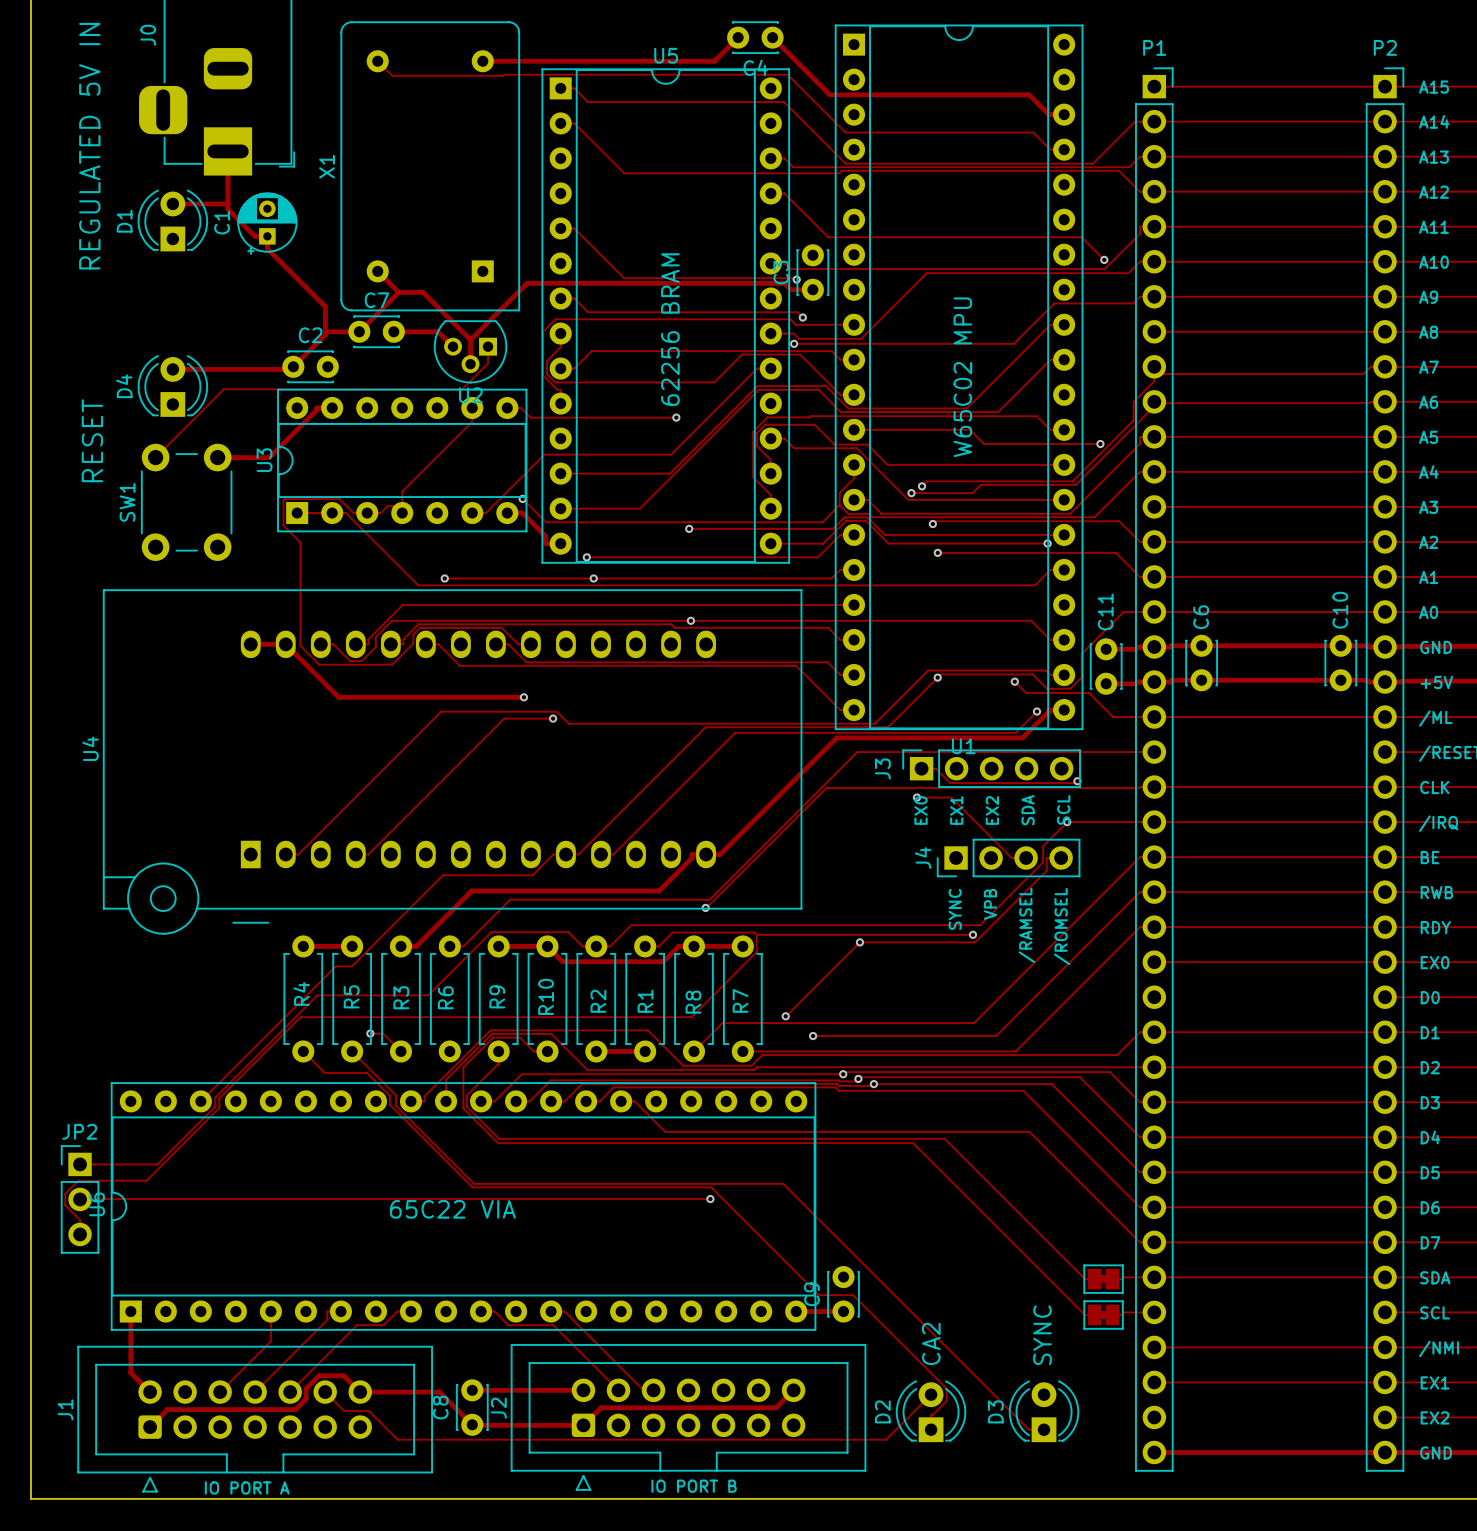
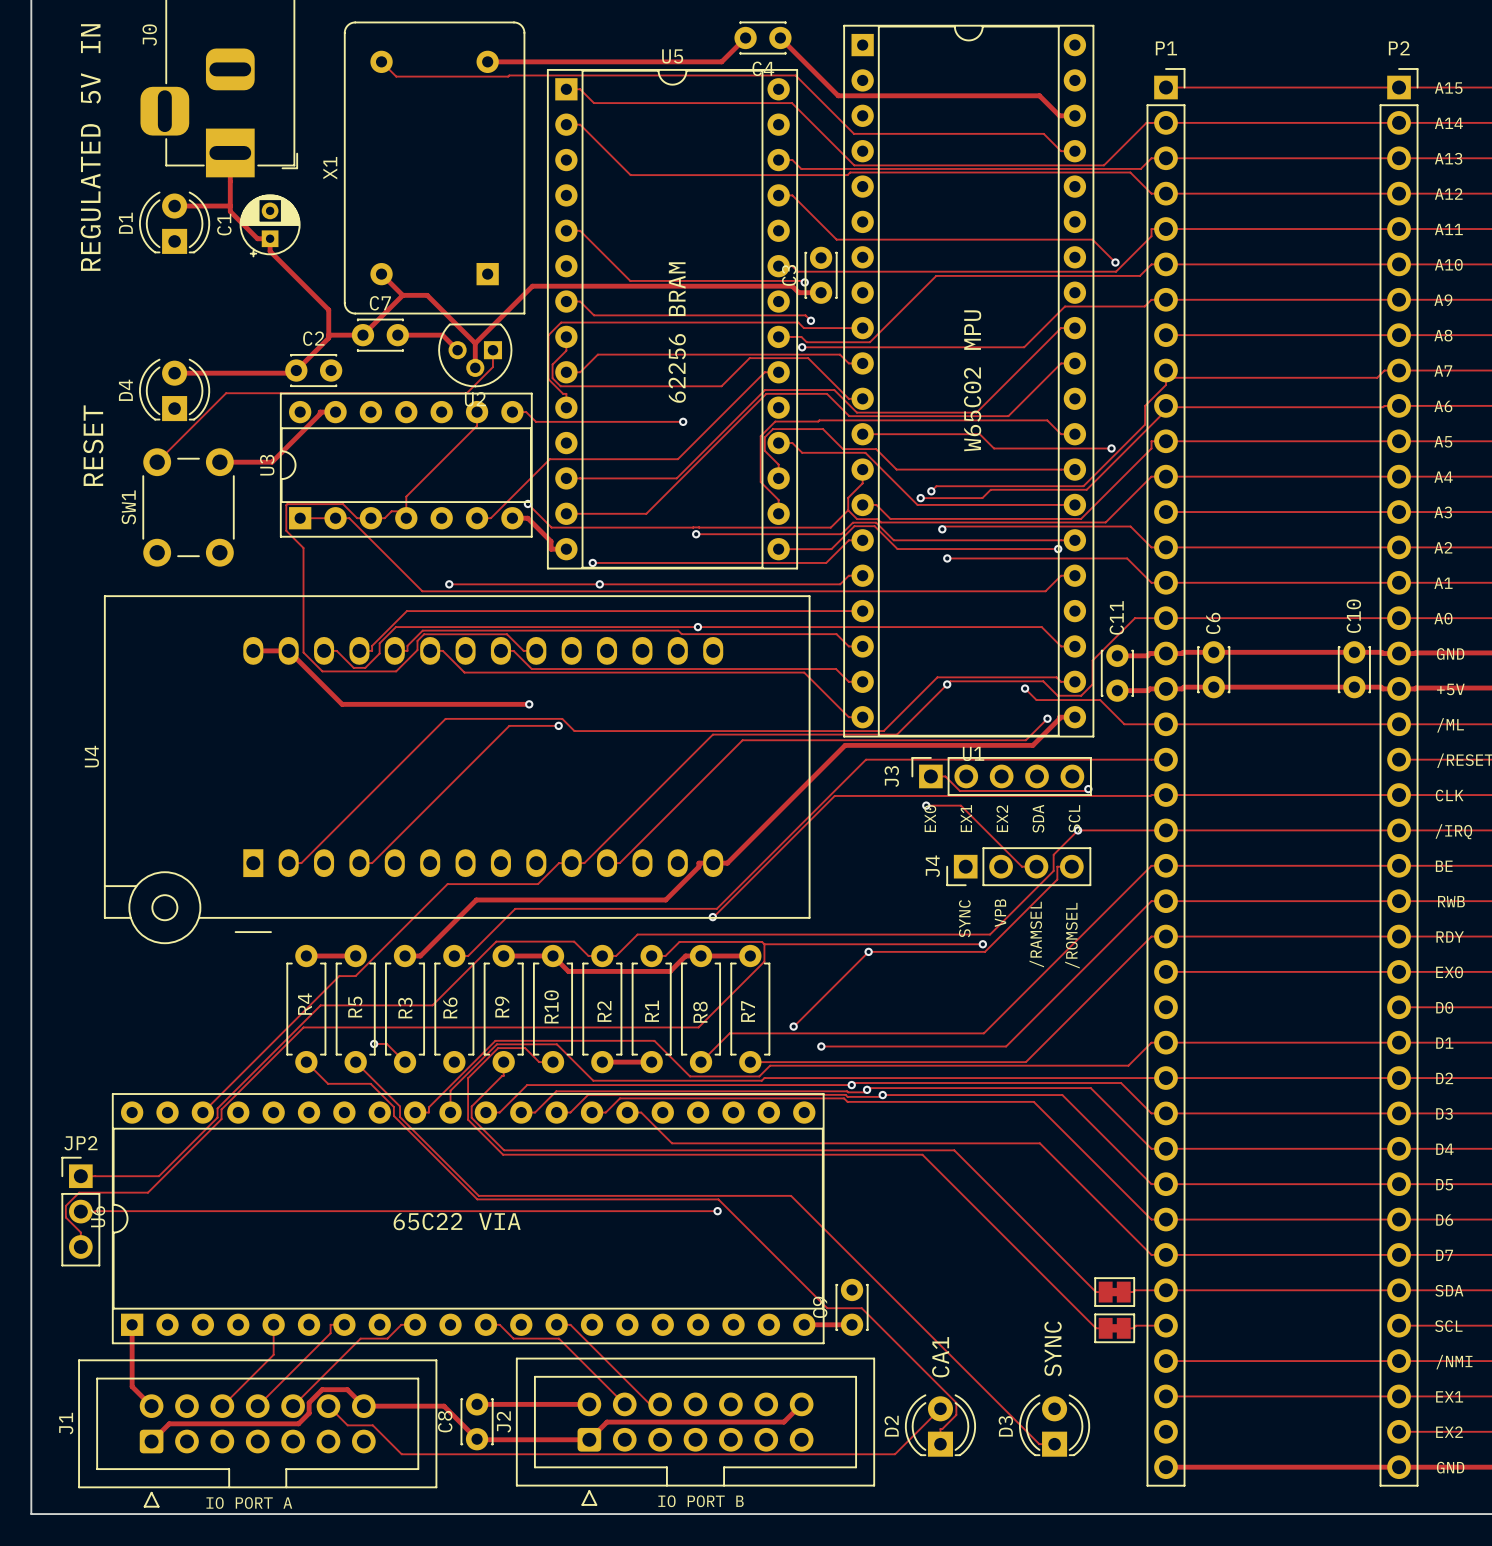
text: CA2 (931, 1343) -> CA1 (940, 1357)

